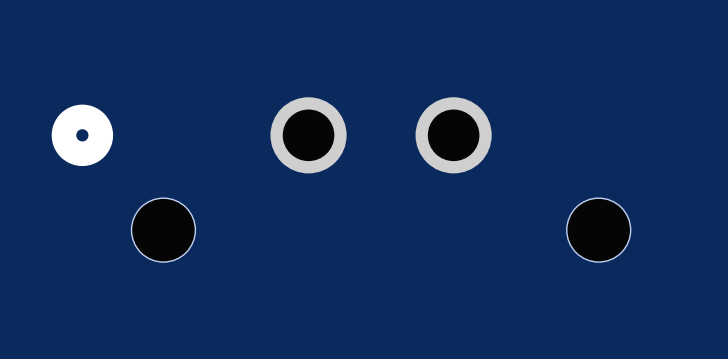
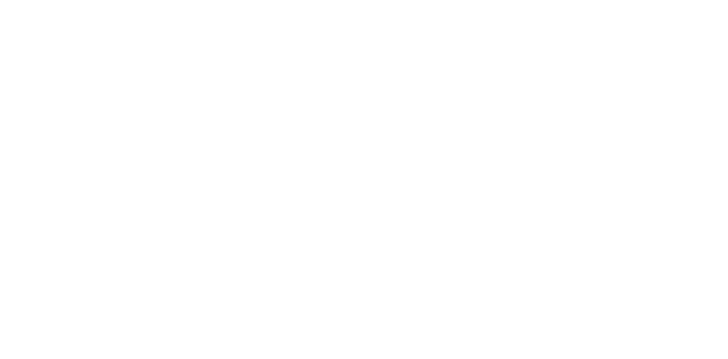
part: (341, 179) -> none

